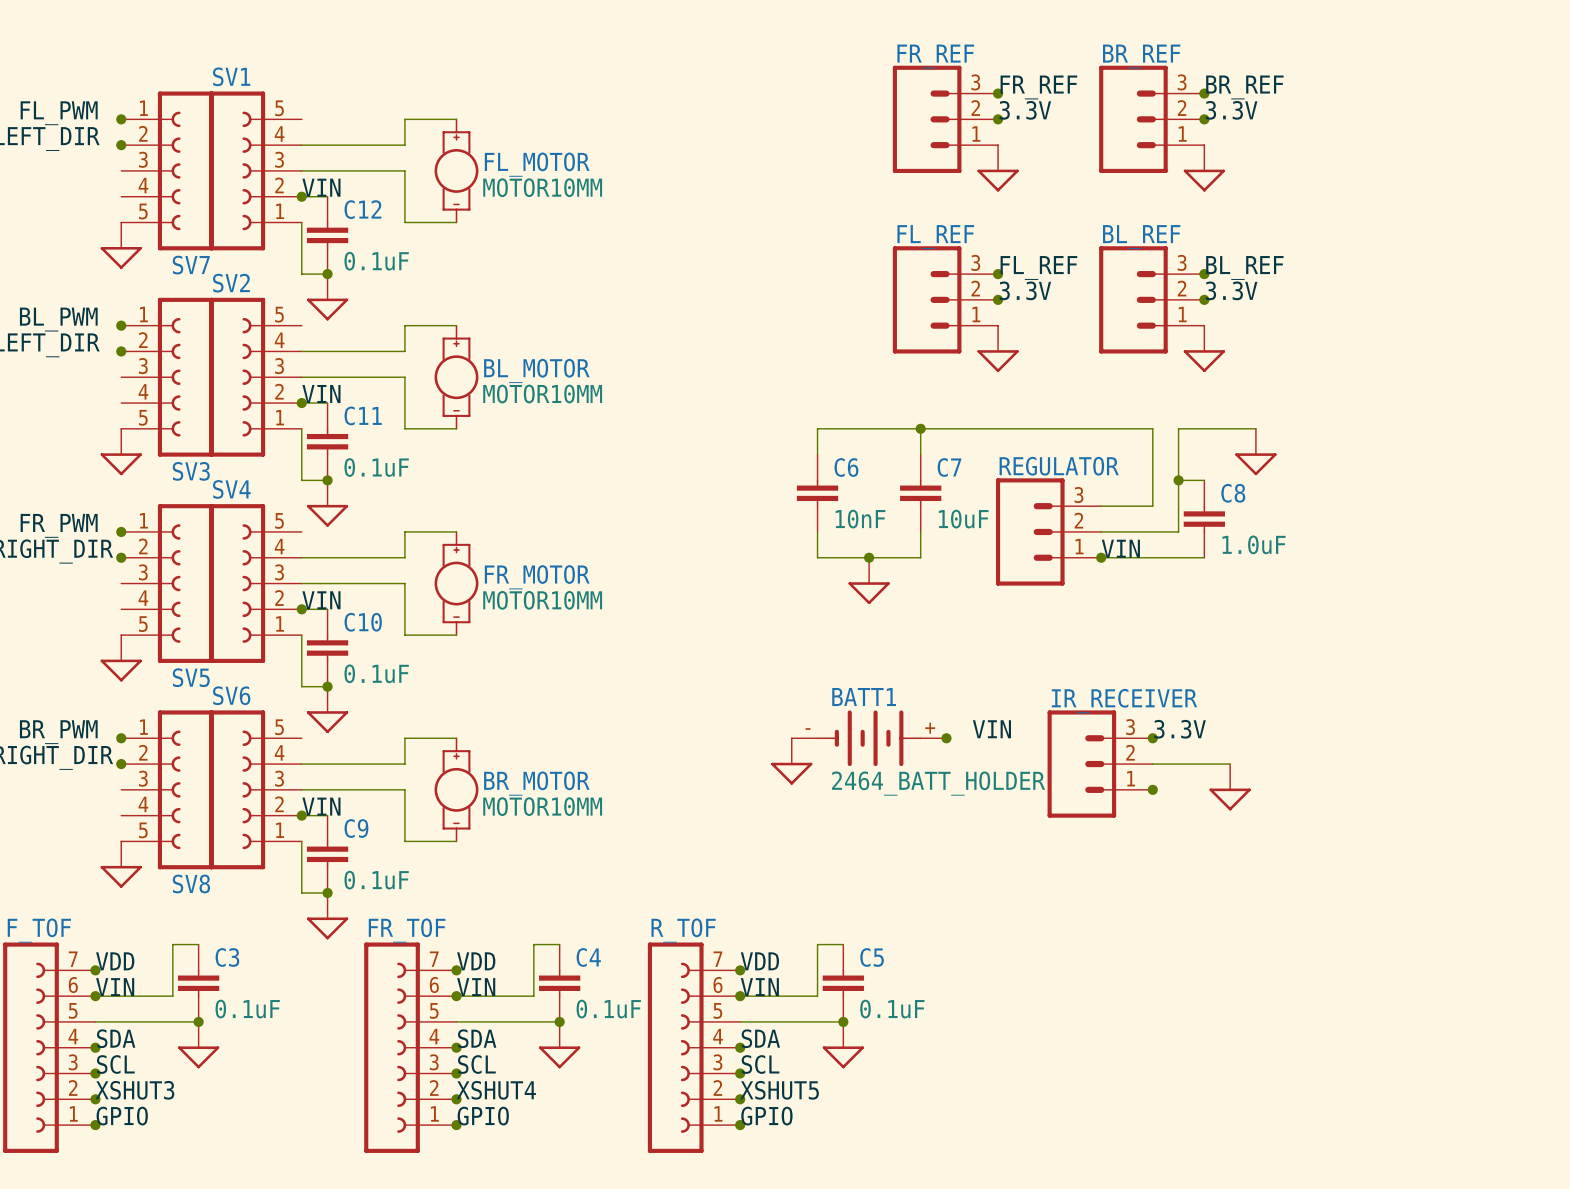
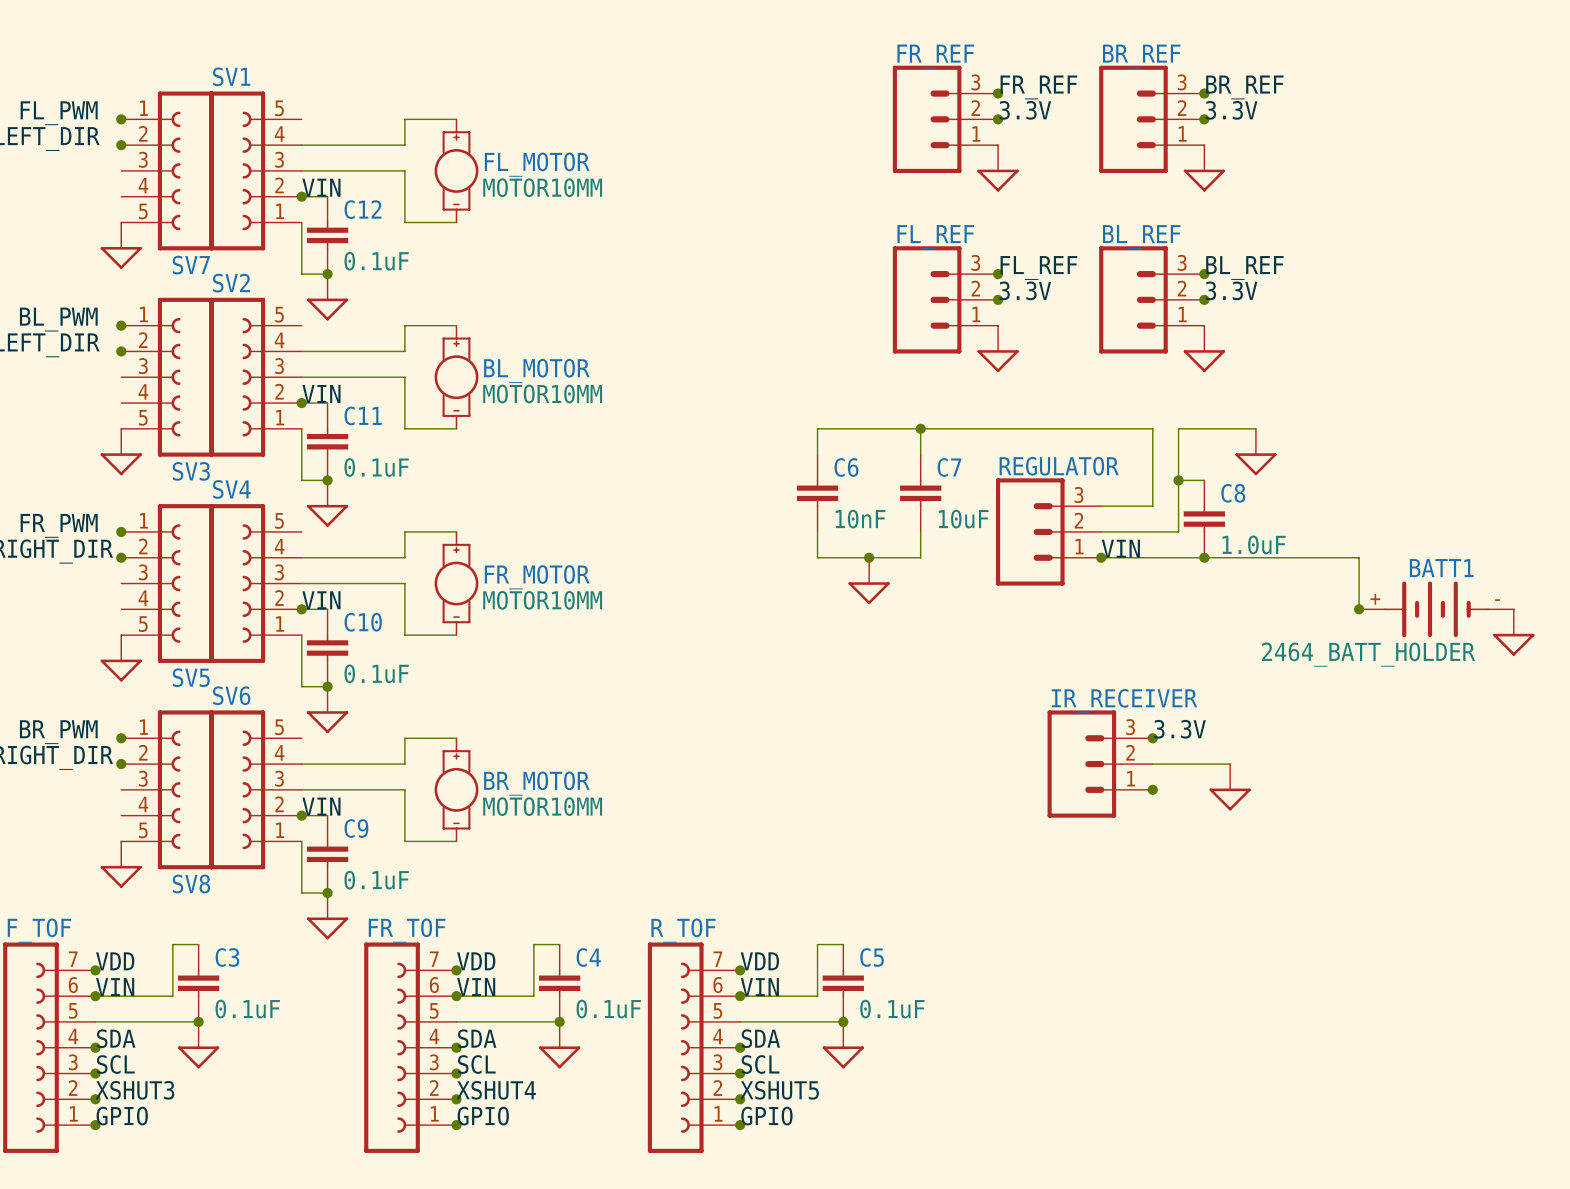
wire: none -> (1204, 557) (1359, 557) (1359, 609)
junction: none -> (1204, 557)
junction: none -> (1359, 609)
power symbol: none -> (1513, 632)
label: VIN (991, 729) -> none
BATT1 rotation: 0° (869, 738) -> 180° (1436, 609)
BATT1 position: (869, 738) -> (1436, 609)
junction: (946, 738) -> none
power symbol: (791, 761) -> none
BATT1 value position: 2464_BATT_HOLDER (938, 783) -> 2464_BATT_HOLDER (1368, 654)

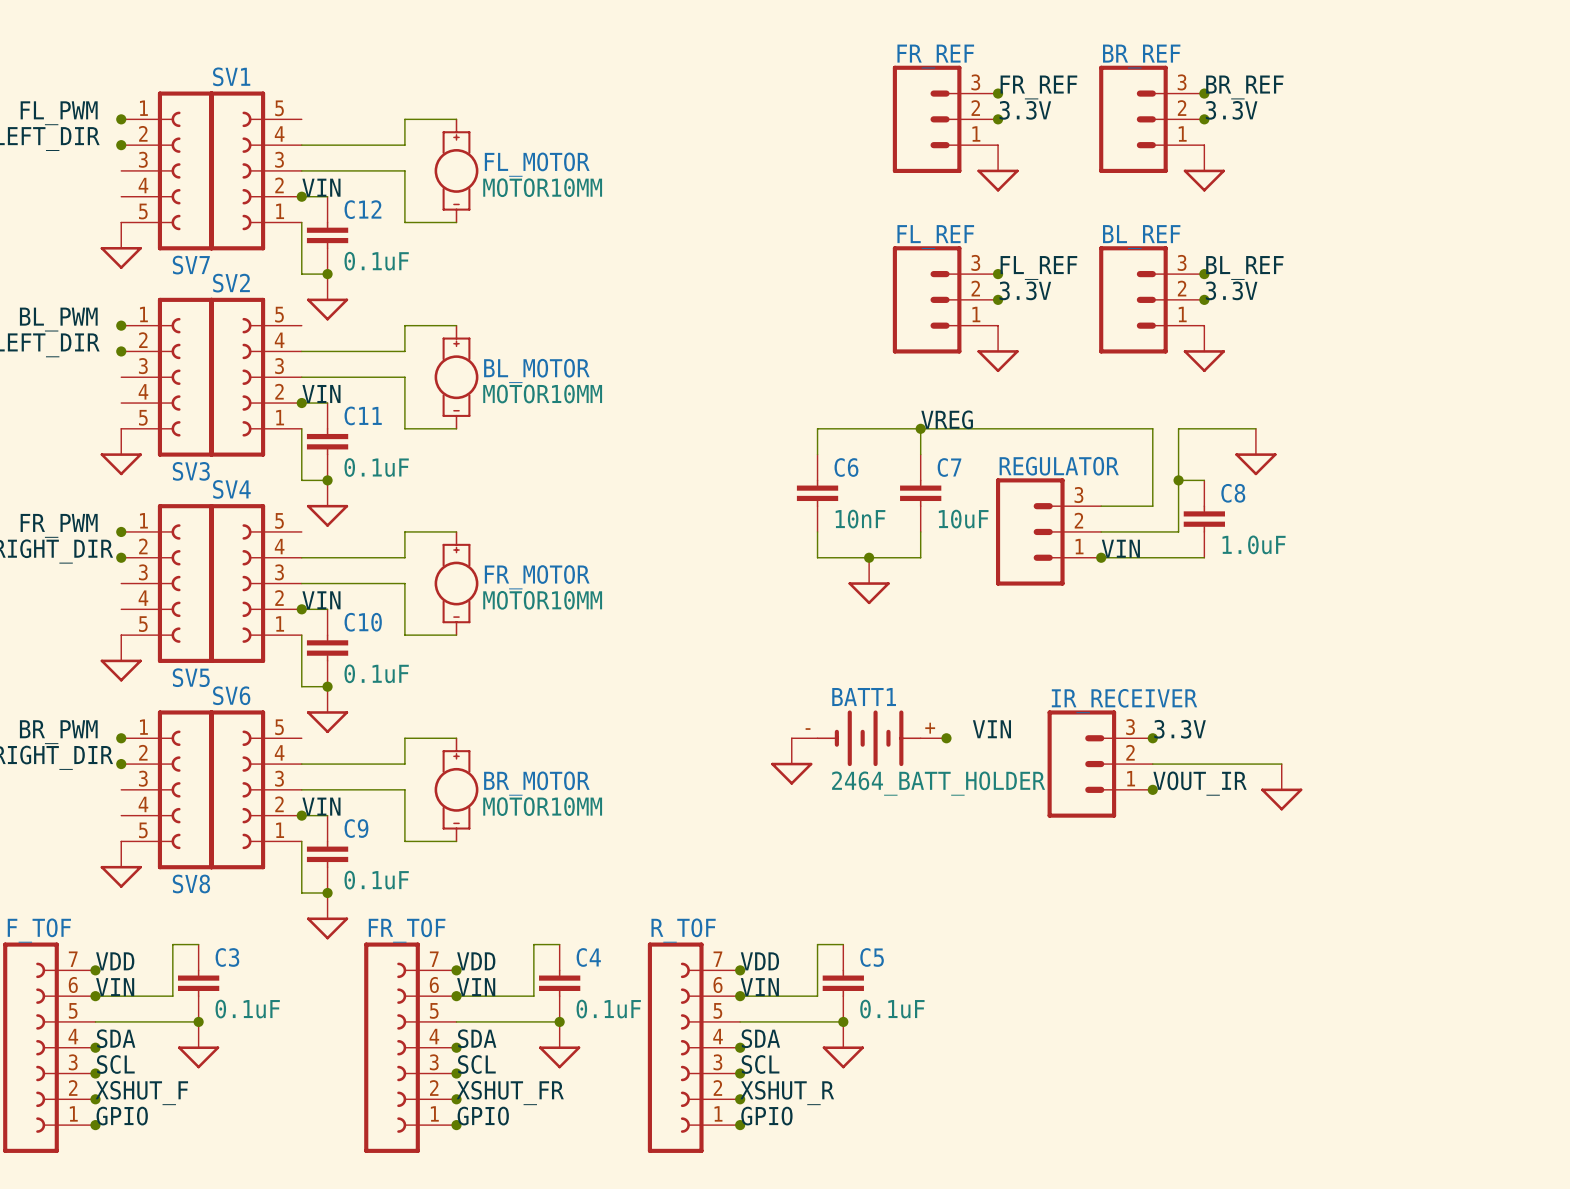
label: none -> VREG (947, 419)
wire: (1204, 557) (1359, 557) (1359, 609) -> none
junction: (1204, 557) -> none
junction: (1359, 609) -> none
BATT1 rotation: 0° (1436, 609) -> 180° (869, 738)
BATT1 position: (1436, 609) -> (869, 738)
power symbol: (1513, 632) -> none
BATT1 value position: 2464_BATT_HOLDER (1368, 654) -> 2464_BATT_HOLDER (938, 783)
label: none -> VIN (991, 729)
junction: none -> (946, 738)
power symbol: none -> (791, 761)
wire: none -> (1230, 764) (1281, 764)
label: none -> VOUT_IR (1200, 783)
power symbol position: (1230, 787) -> (1281, 787)
label: XSHUT3 (134, 1090) -> XSHUT_F (141, 1093)
label: XSHUT4 (496, 1090) -> XSHUT_FR (510, 1093)
label: XSHUT5 (779, 1090) -> XSHUT_R (787, 1093)

